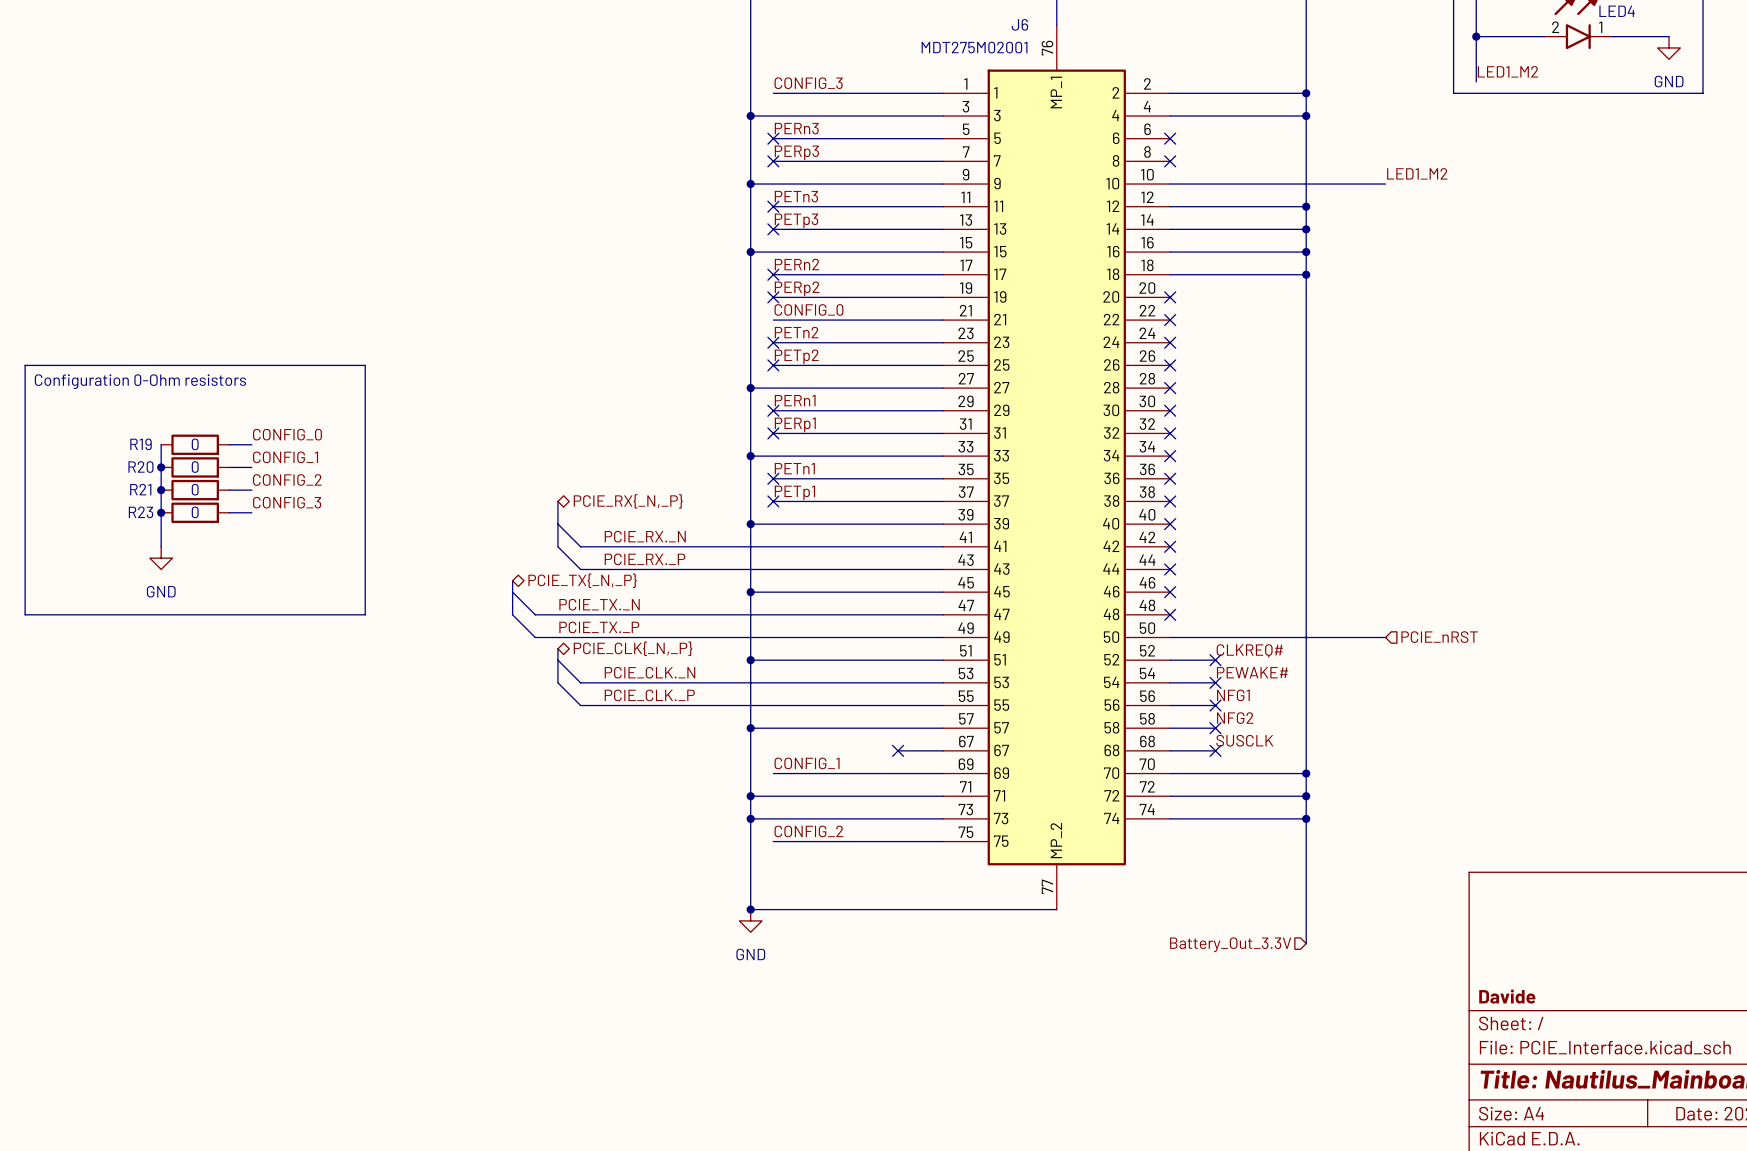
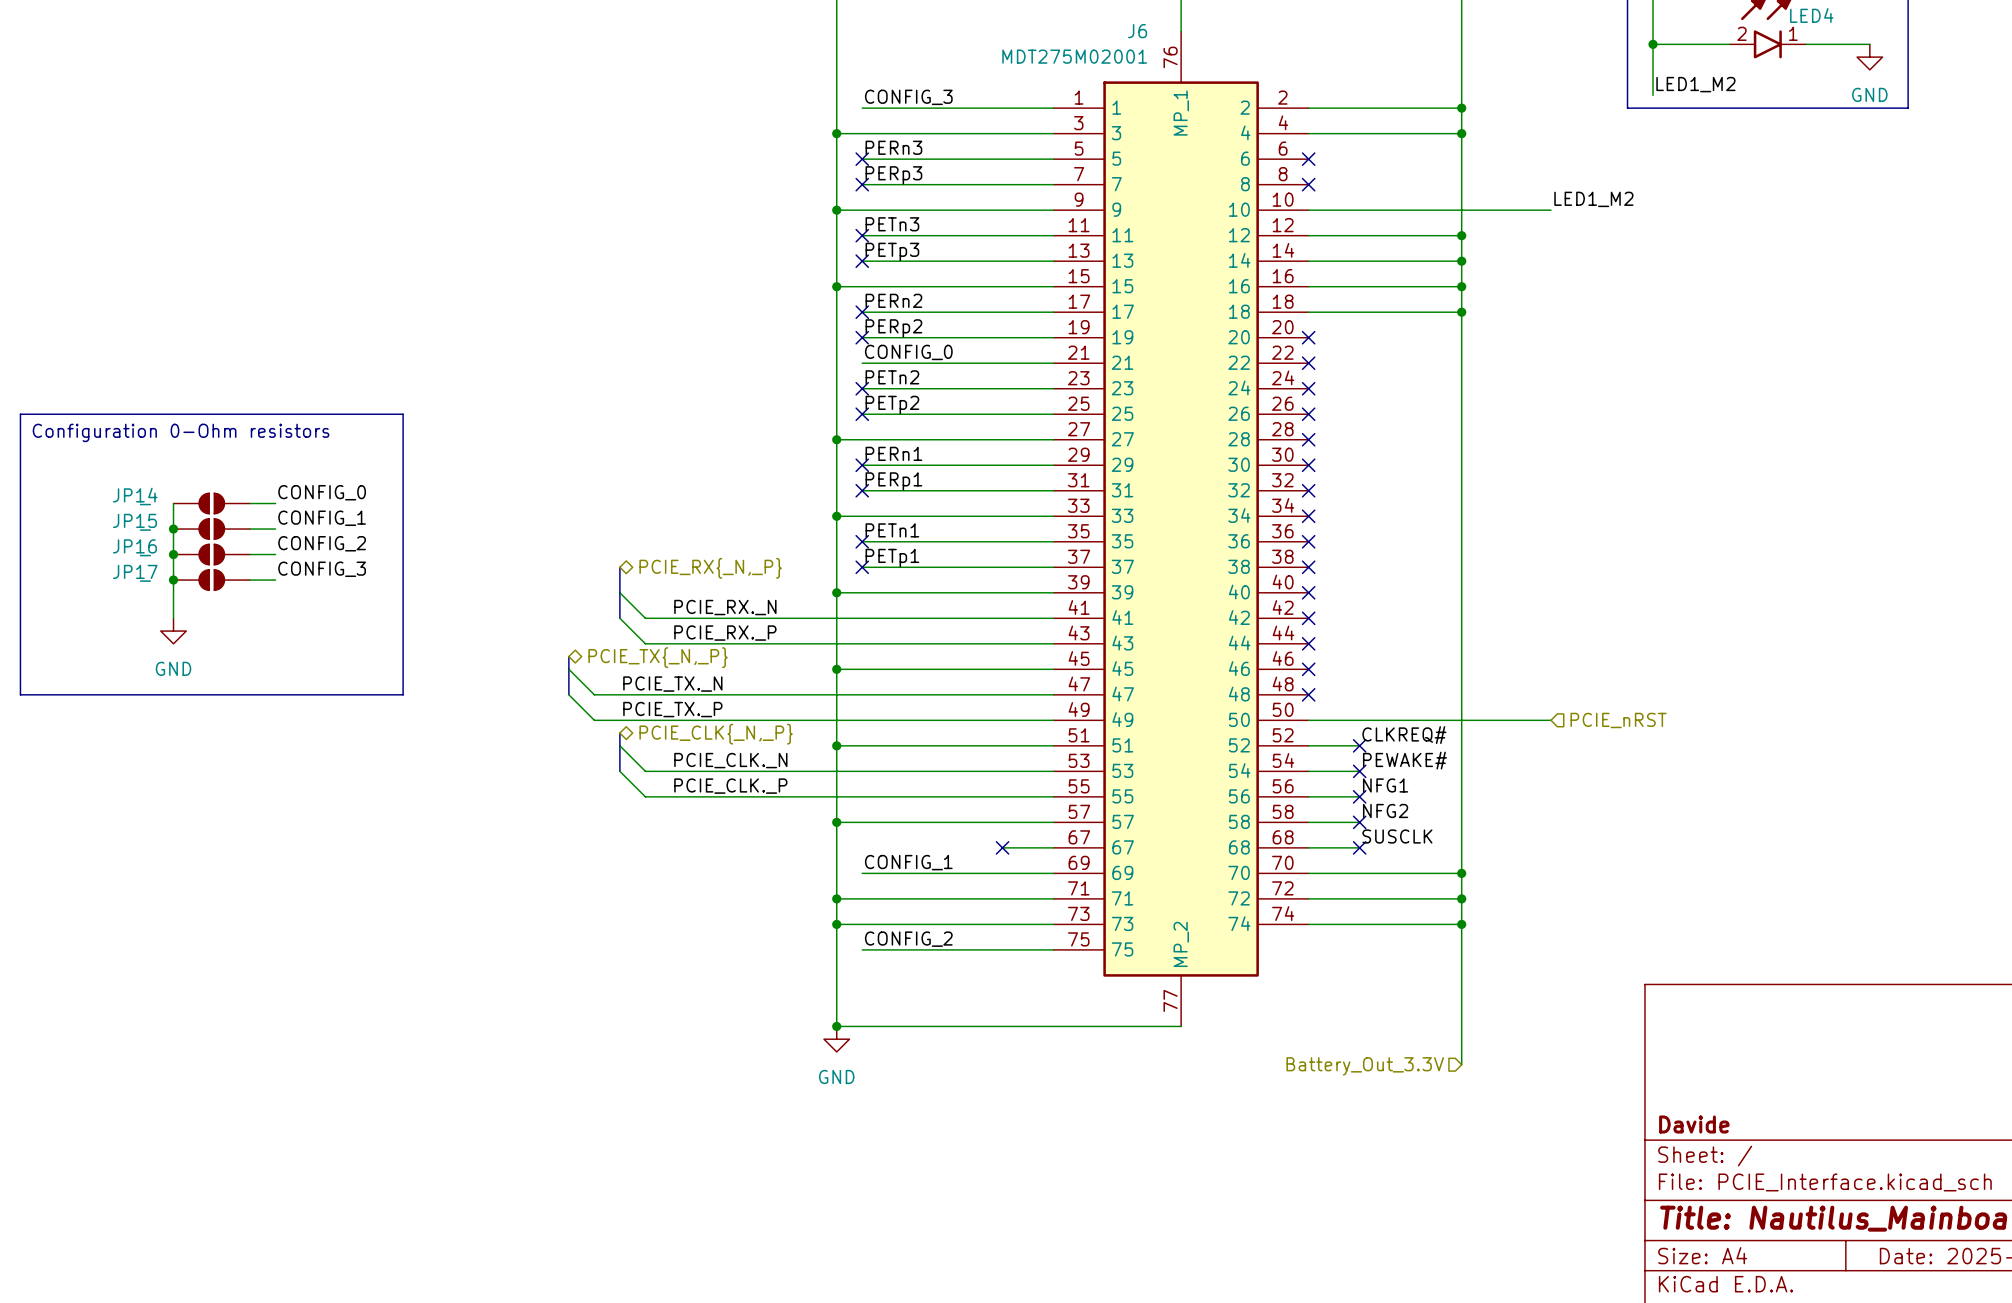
R19: 0 (195, 444) -> none
JP14: none -> - (211, 503)
R20: 0 (195, 467) -> none
JP15: none -> - (211, 529)
R21: 0 (195, 490) -> none
JP16: none -> - (211, 554)
R23: 0 (195, 512) -> none
JP17: none -> - (211, 580)

